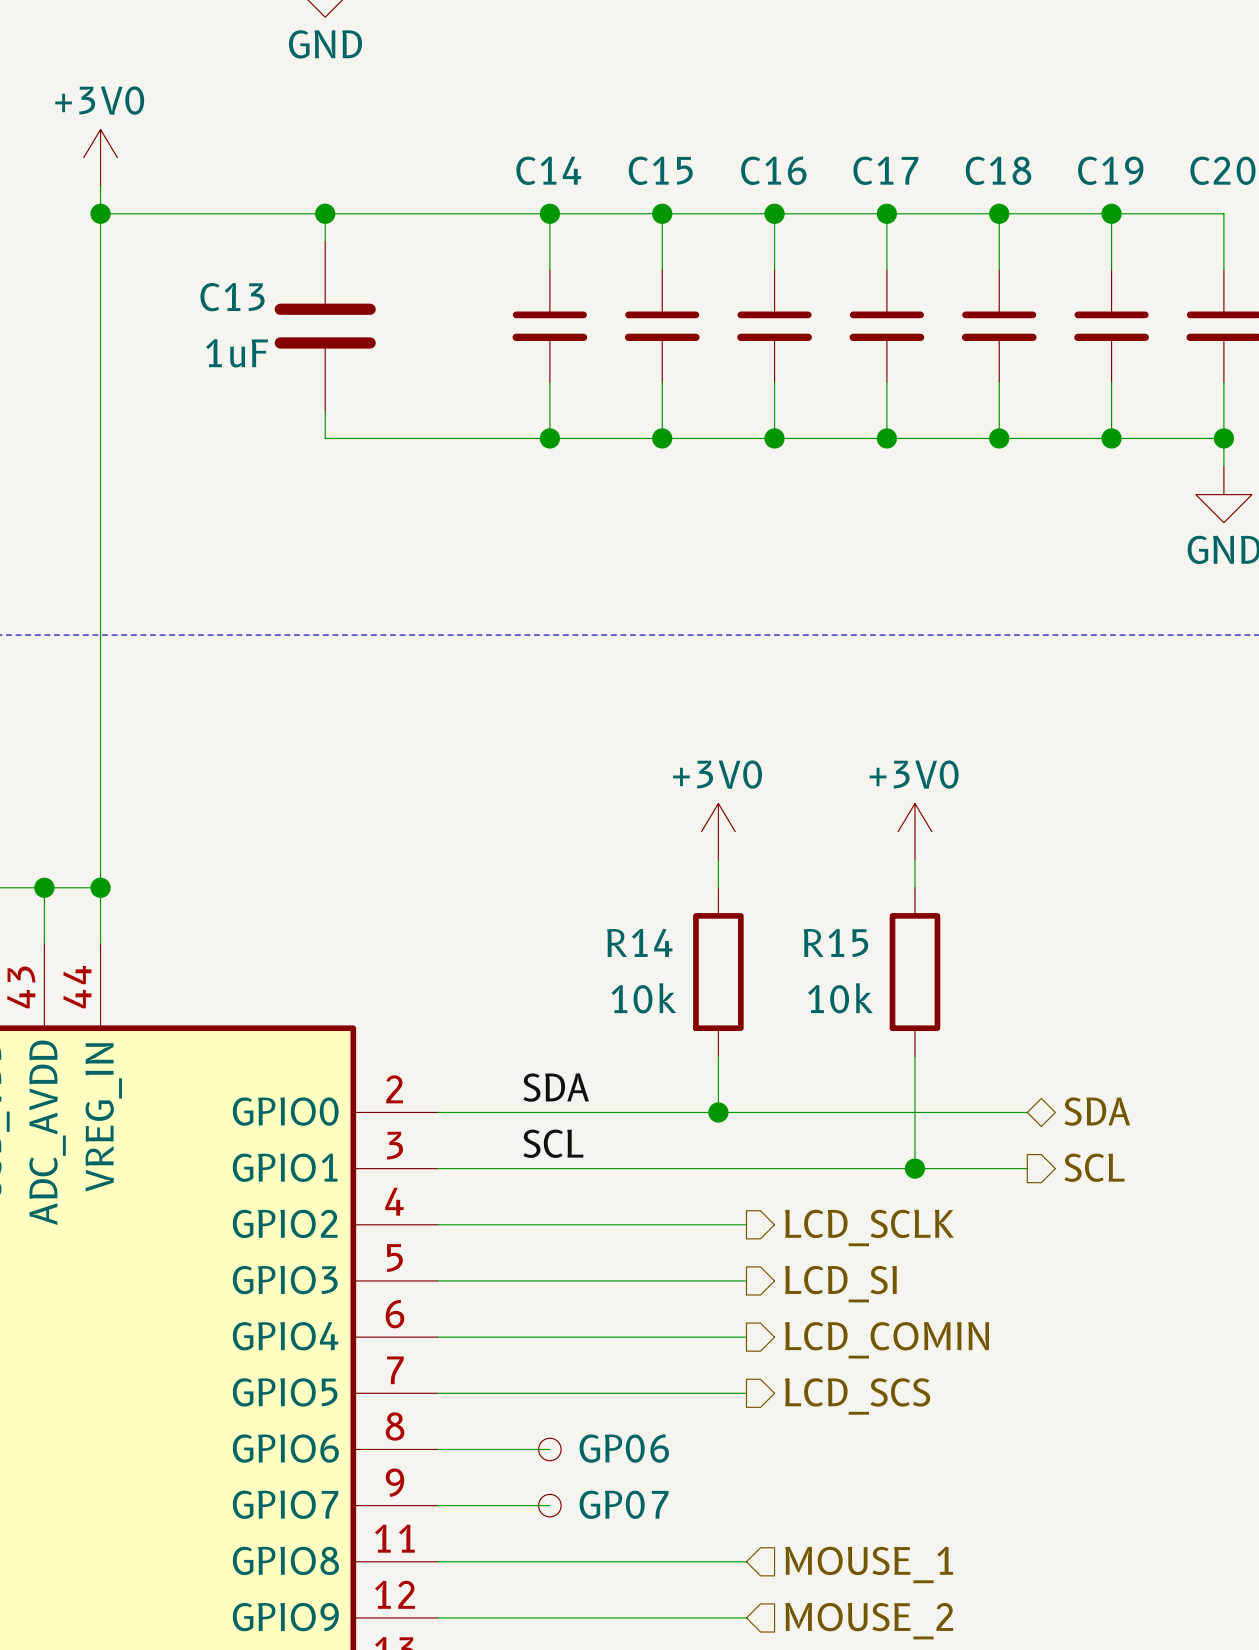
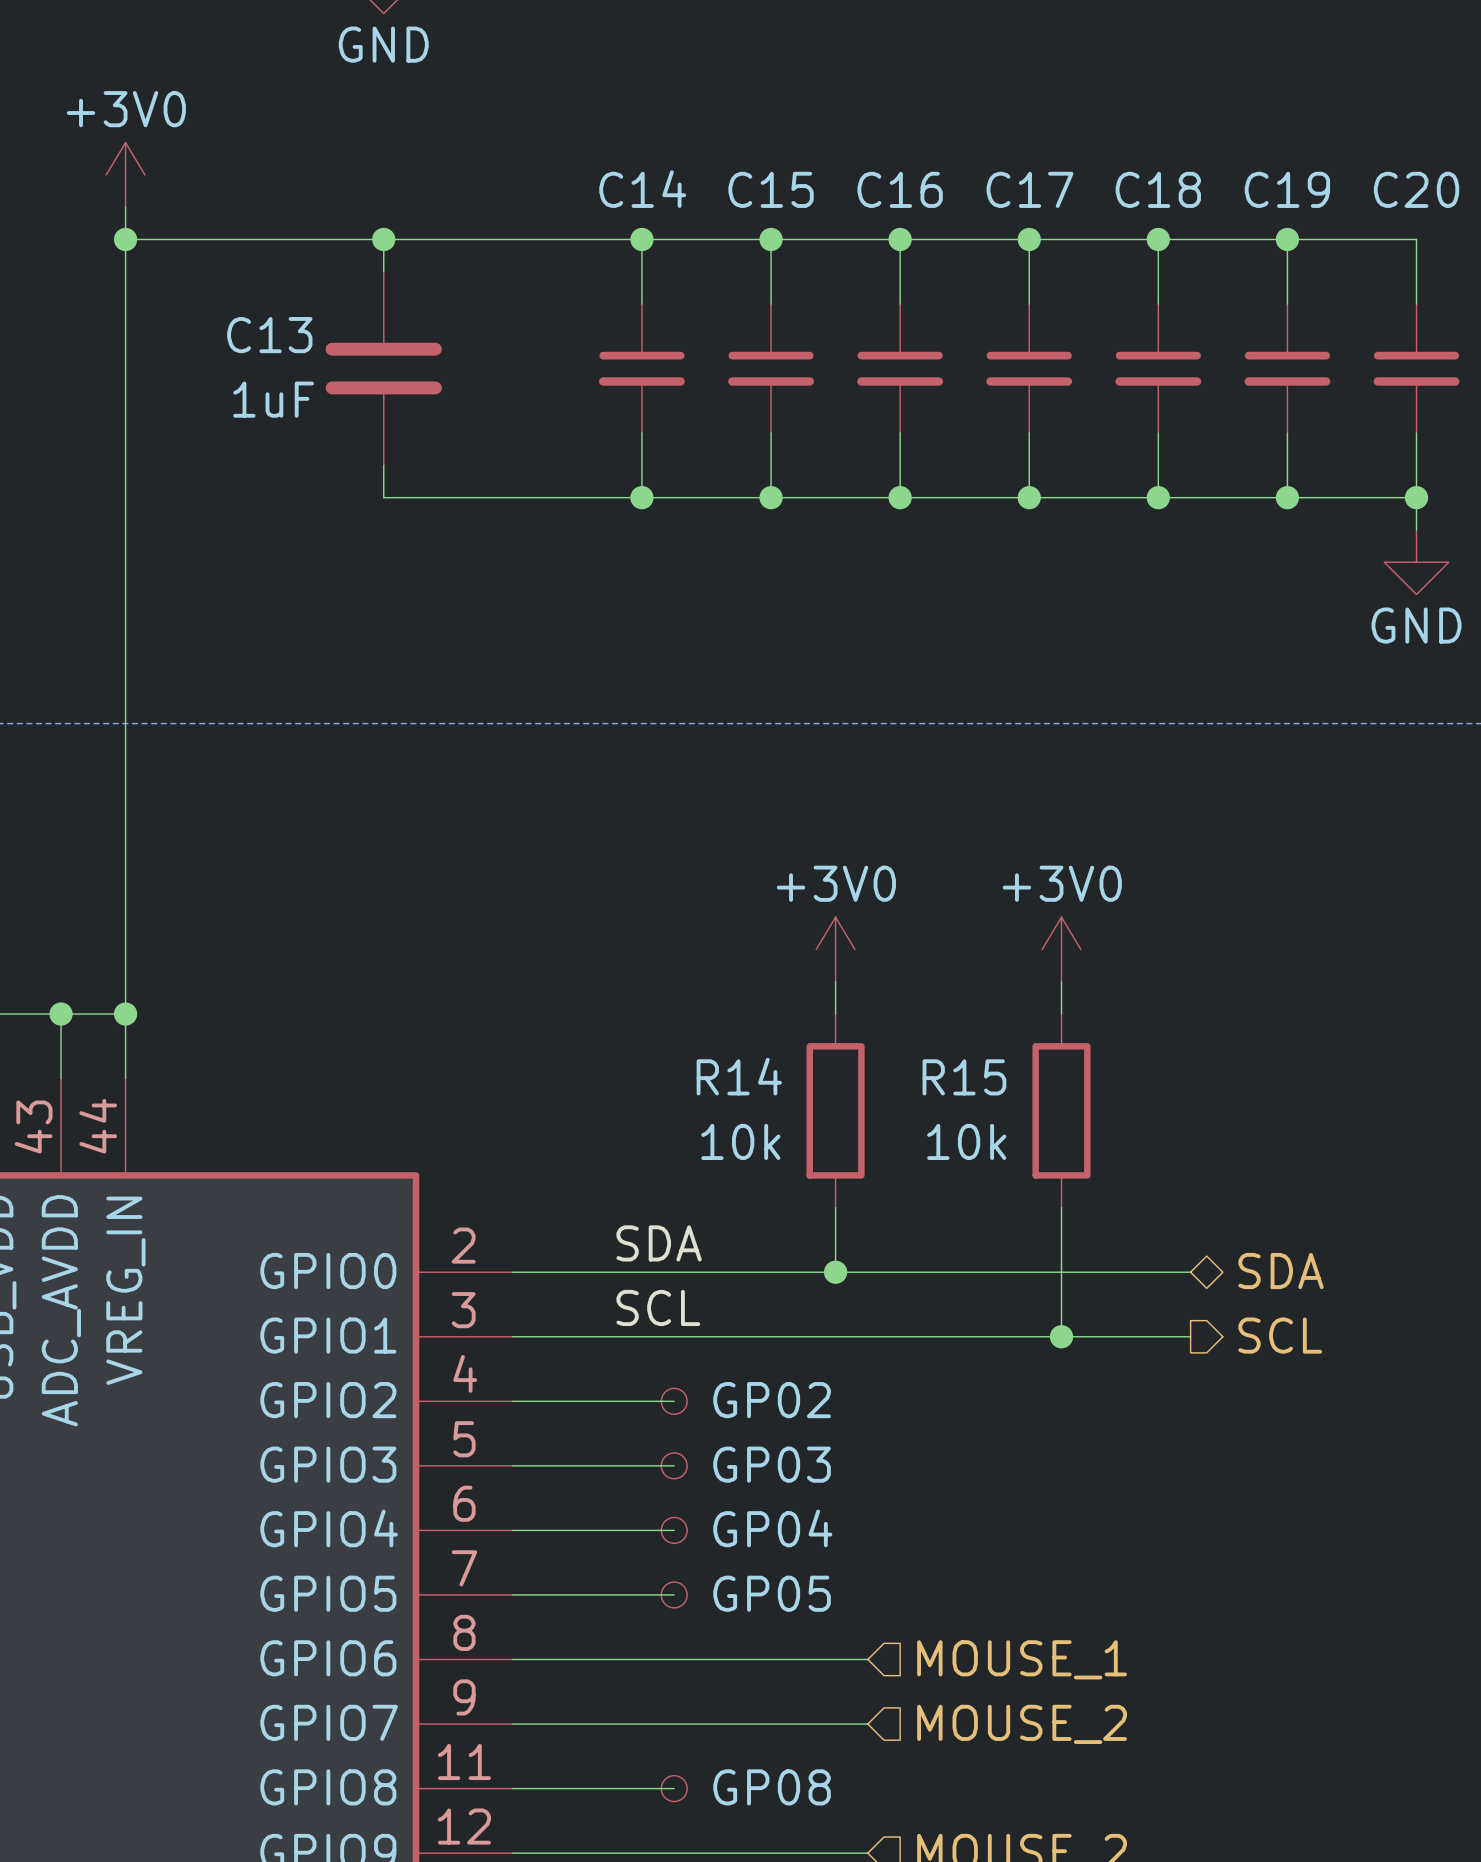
wire: (577, 1224) (746, 1224) -> none
part: none -> GP02 (674, 1401)
hierarchical label: LCD_SCLK (869, 1227) -> none
wire: (577, 1280) (746, 1280) -> none
part: none -> GP03 (674, 1465)
hierarchical label: LCD_SI (840, 1284) -> none
wire: (577, 1337) (746, 1337) -> none
part: none -> GP04 (674, 1530)
hierarchical label: LCD_COMIN (887, 1340) -> none
wire: (577, 1393) (746, 1393) -> none
part: none -> GP05 (674, 1594)
hierarchical label: LCD_SCS (857, 1396) -> none
wire: none -> (641, 1659) (867, 1659)
part: GP06 (549, 1449) -> none
wire: none -> (641, 1724) (867, 1724)
part: GP07 (549, 1505) -> none
hierarchical label: none -> MOUSE_2 (1022, 1724)
wire: (577, 1561) (746, 1561) -> none
part: none -> GP08 (674, 1788)
hierarchical label position: MOUSE_1 (869, 1564) -> MOUSE_1 (1022, 1659)

